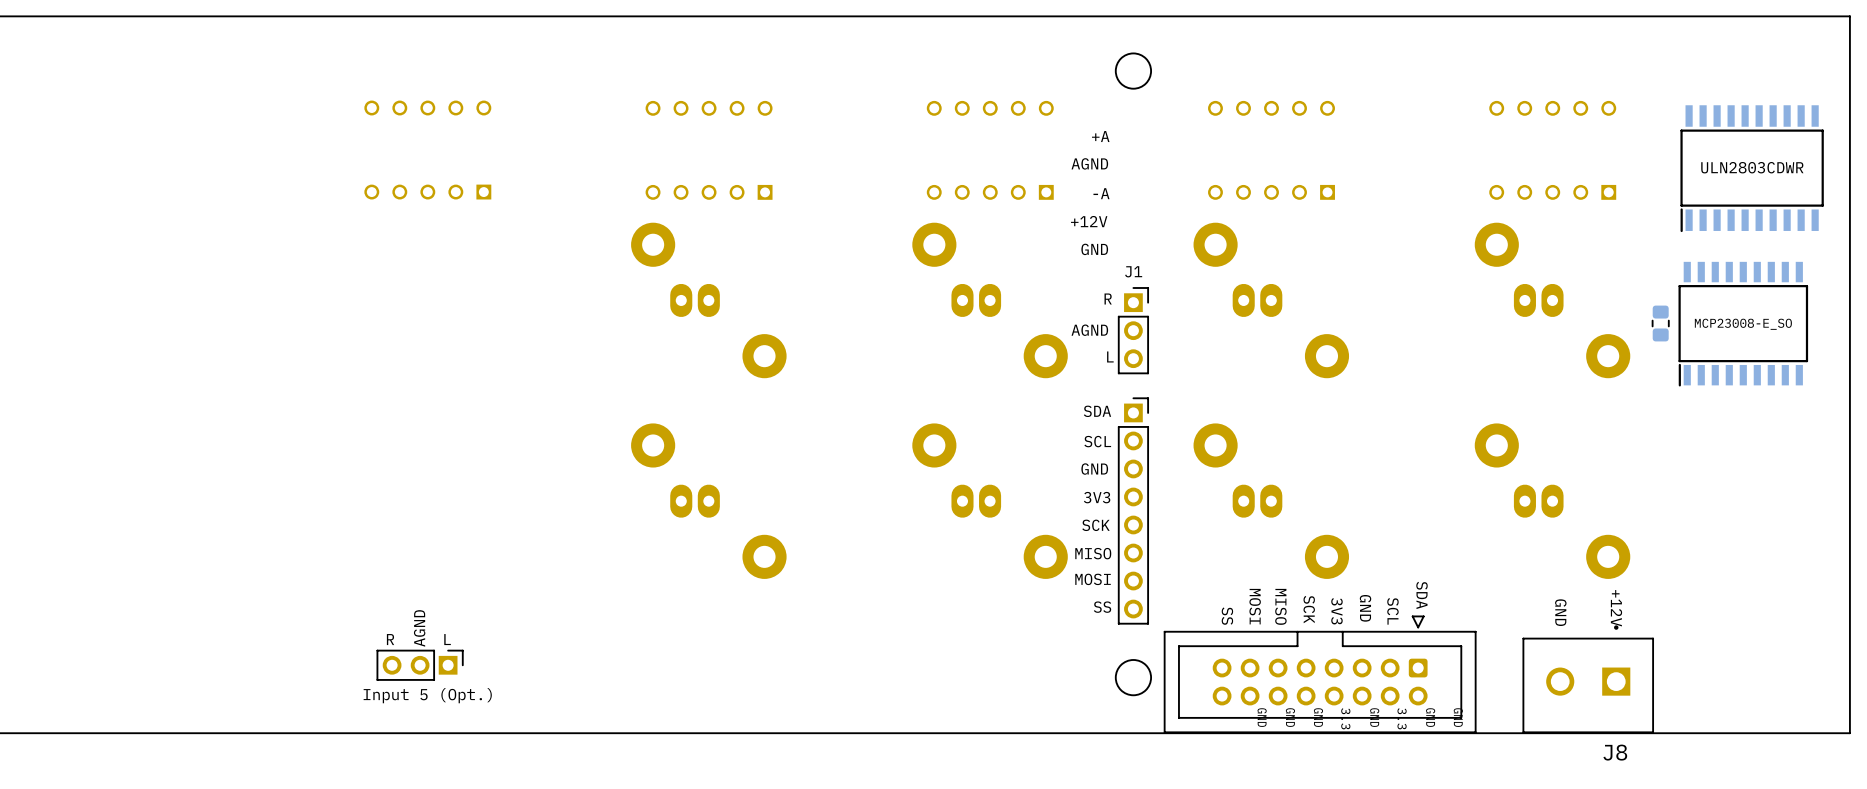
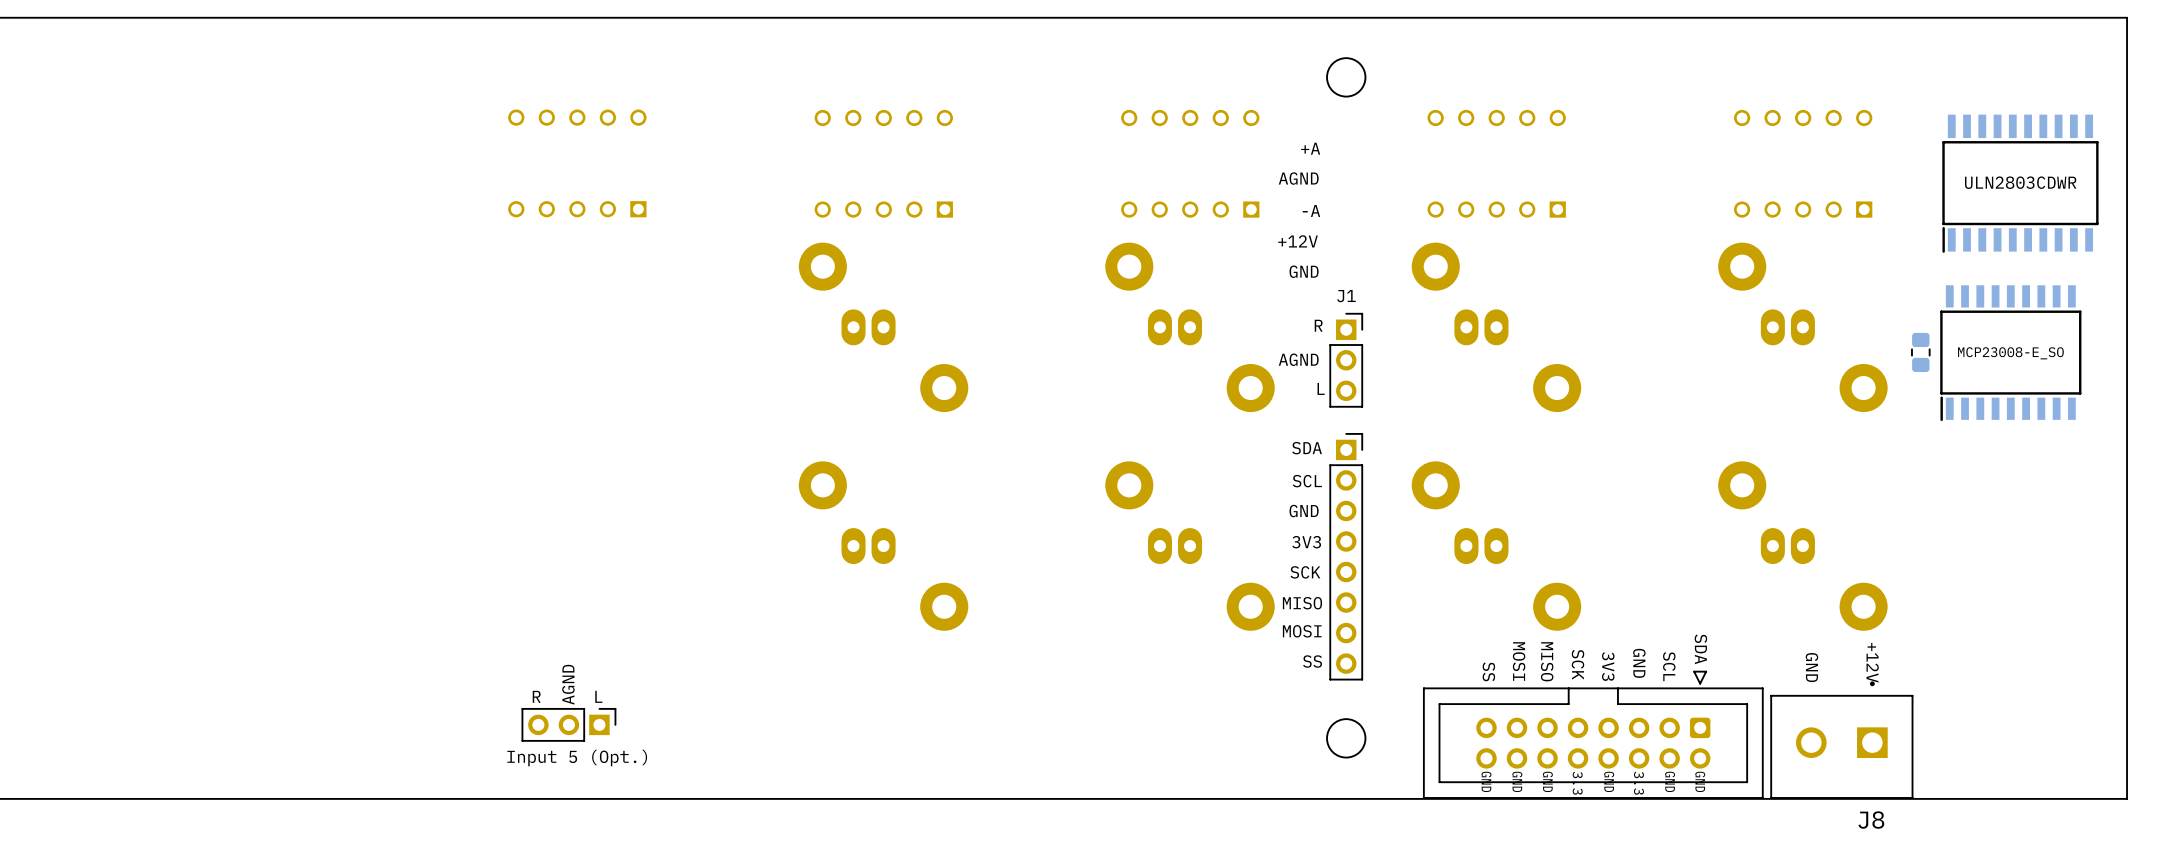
text position: SDA (1422, 595) -> SDA (1700, 649)
text position: MOSI (1255, 606) -> MOSI (1519, 661)
text position: MISO (1280, 606) -> MISO (1547, 661)
text: GND (1365, 608) -> 3V3 (1608, 666)
text: none -> GND (1639, 663)
text: SCK (1309, 609) -> none
text: 3V3 (1336, 611) -> SCK (1578, 664)
text position: SCL (1392, 611) -> SCL (1669, 666)
text position: SS (1227, 616) -> SS (1488, 671)
part position: (1320, 674) -> (1593, 734)

